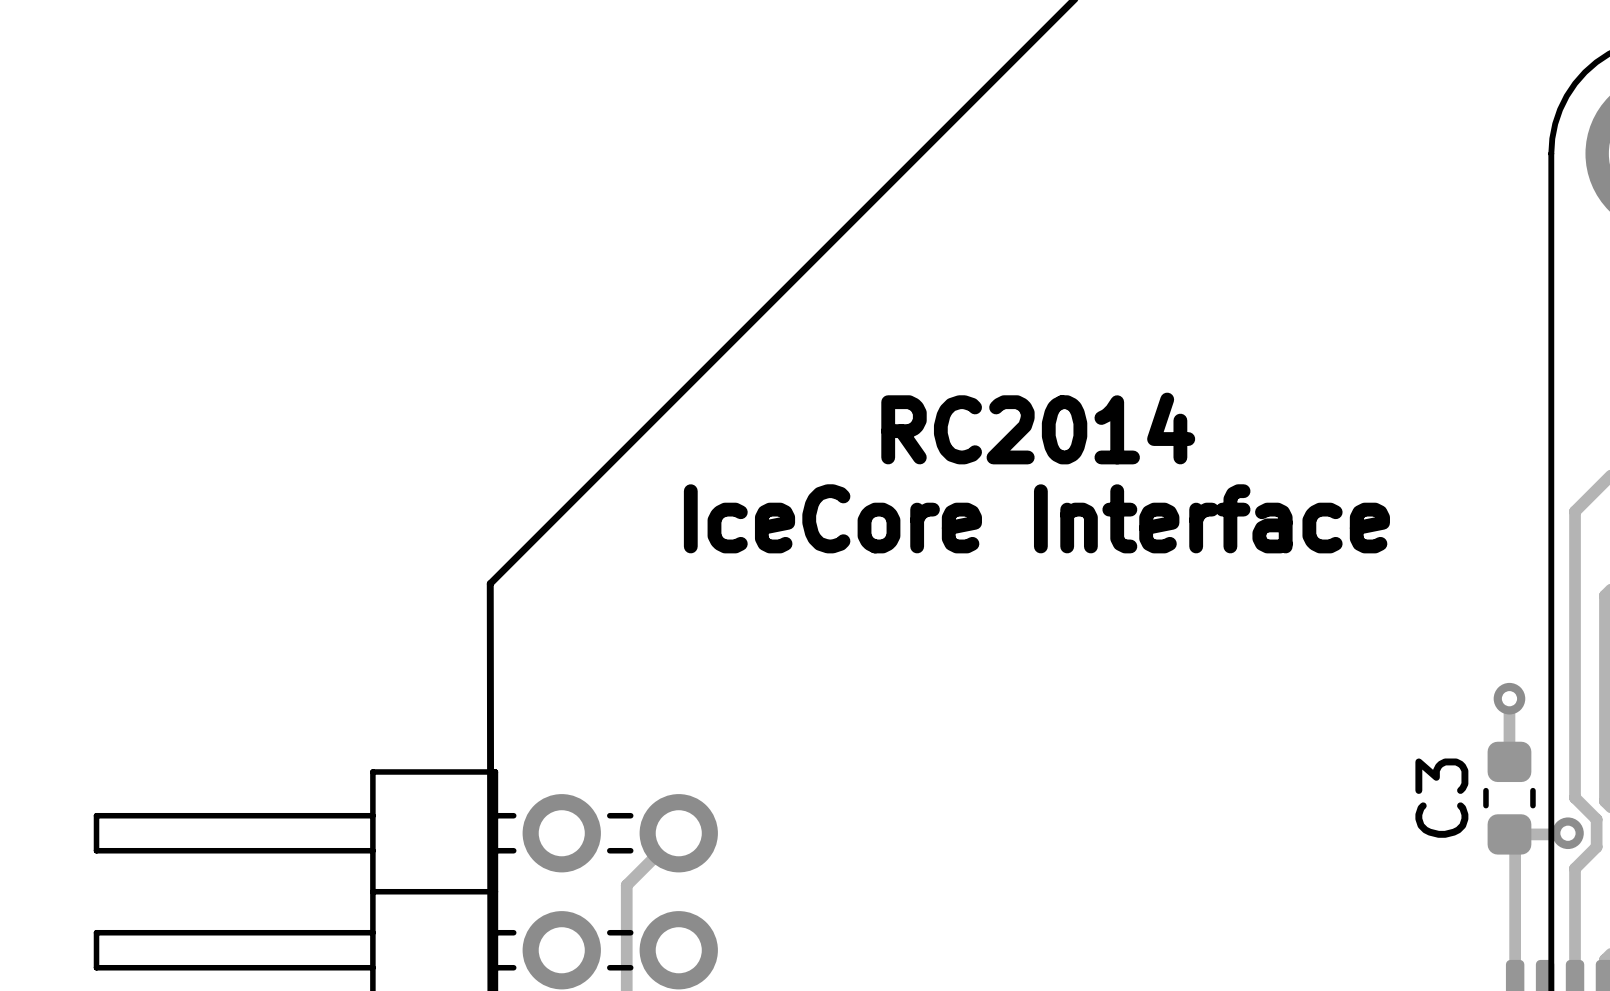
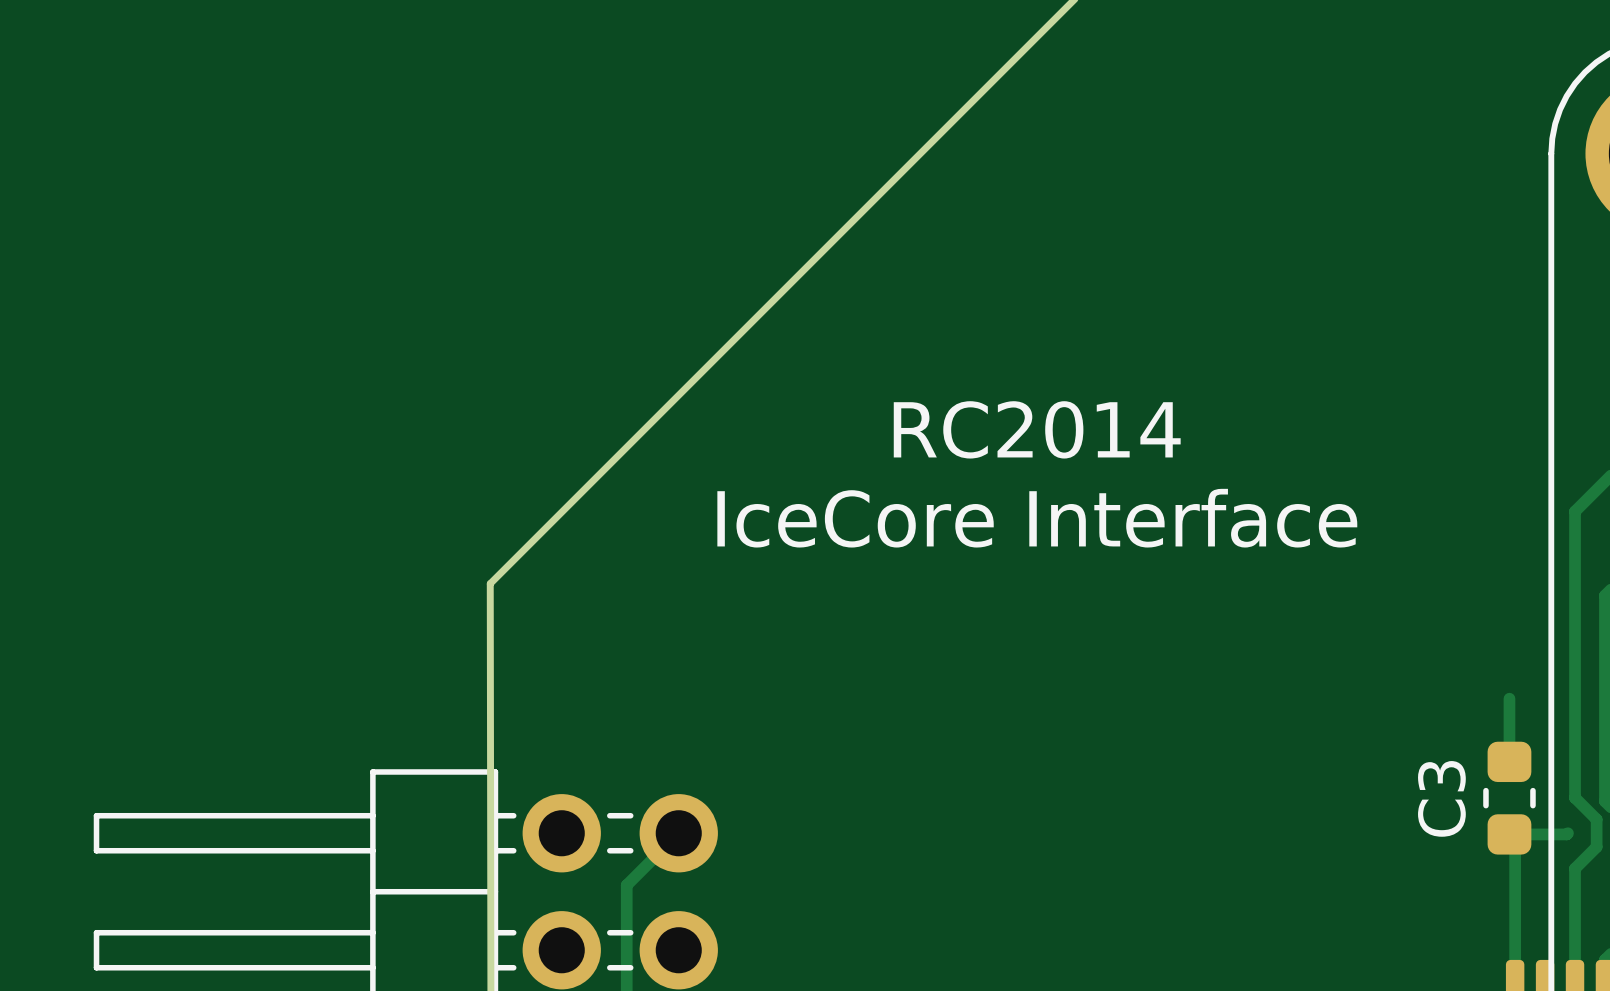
via: (1509, 698) -> none
via: (1567, 833) -> none

